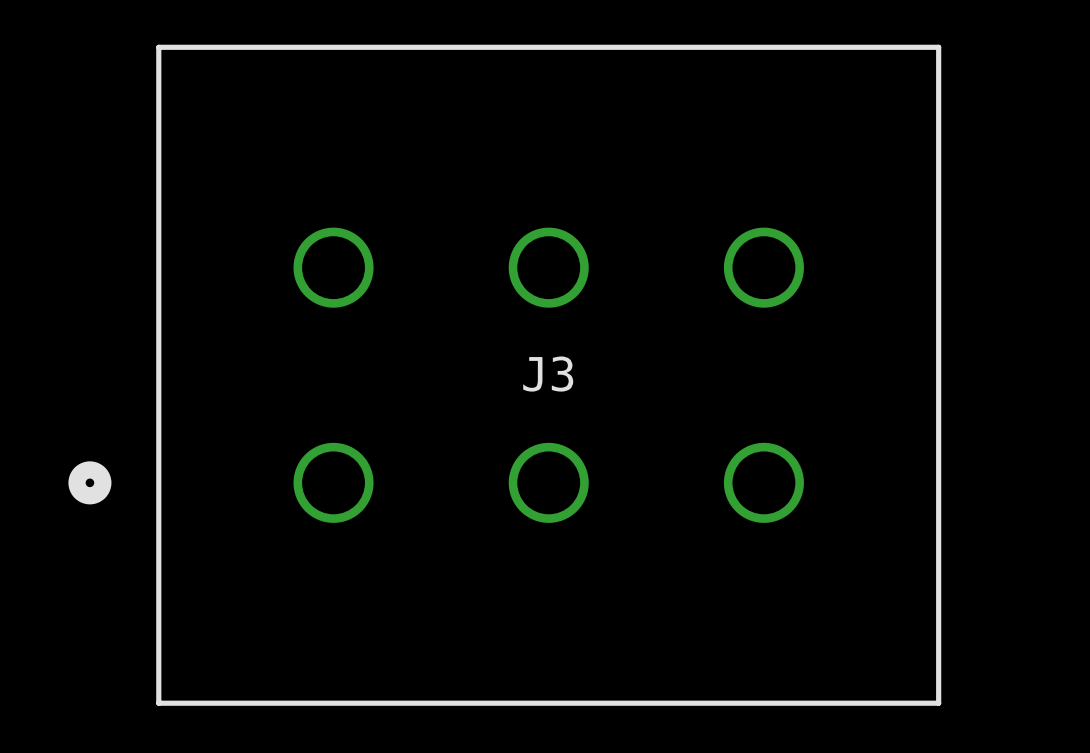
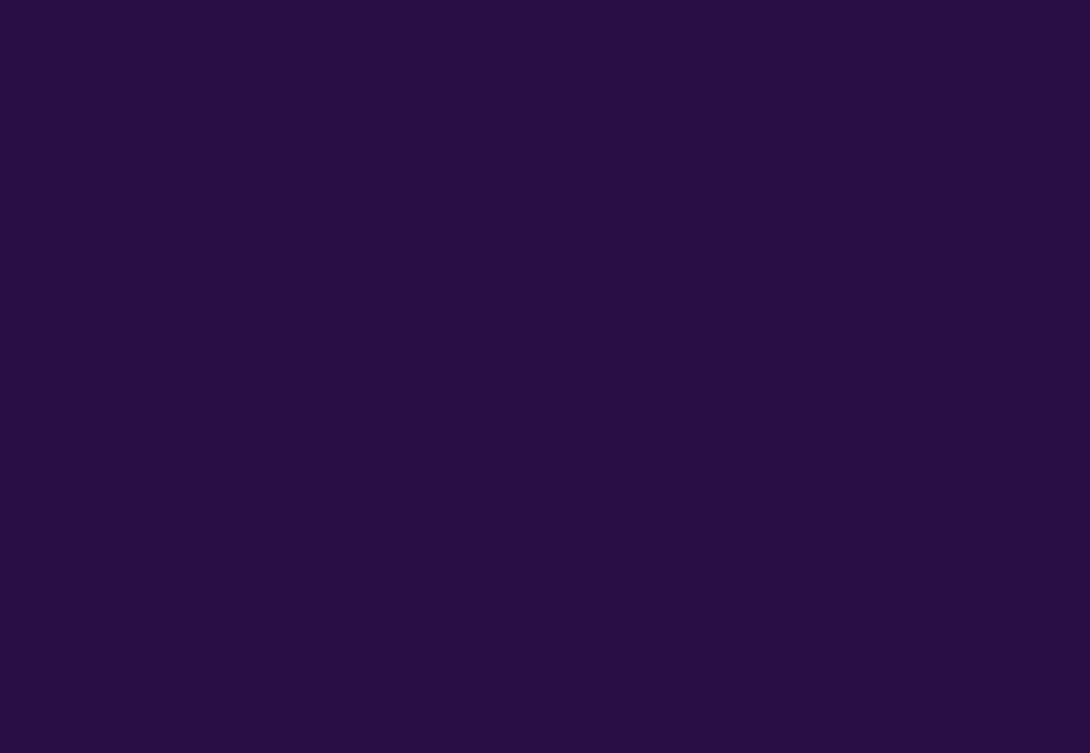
J3: (504, 375) -> none

